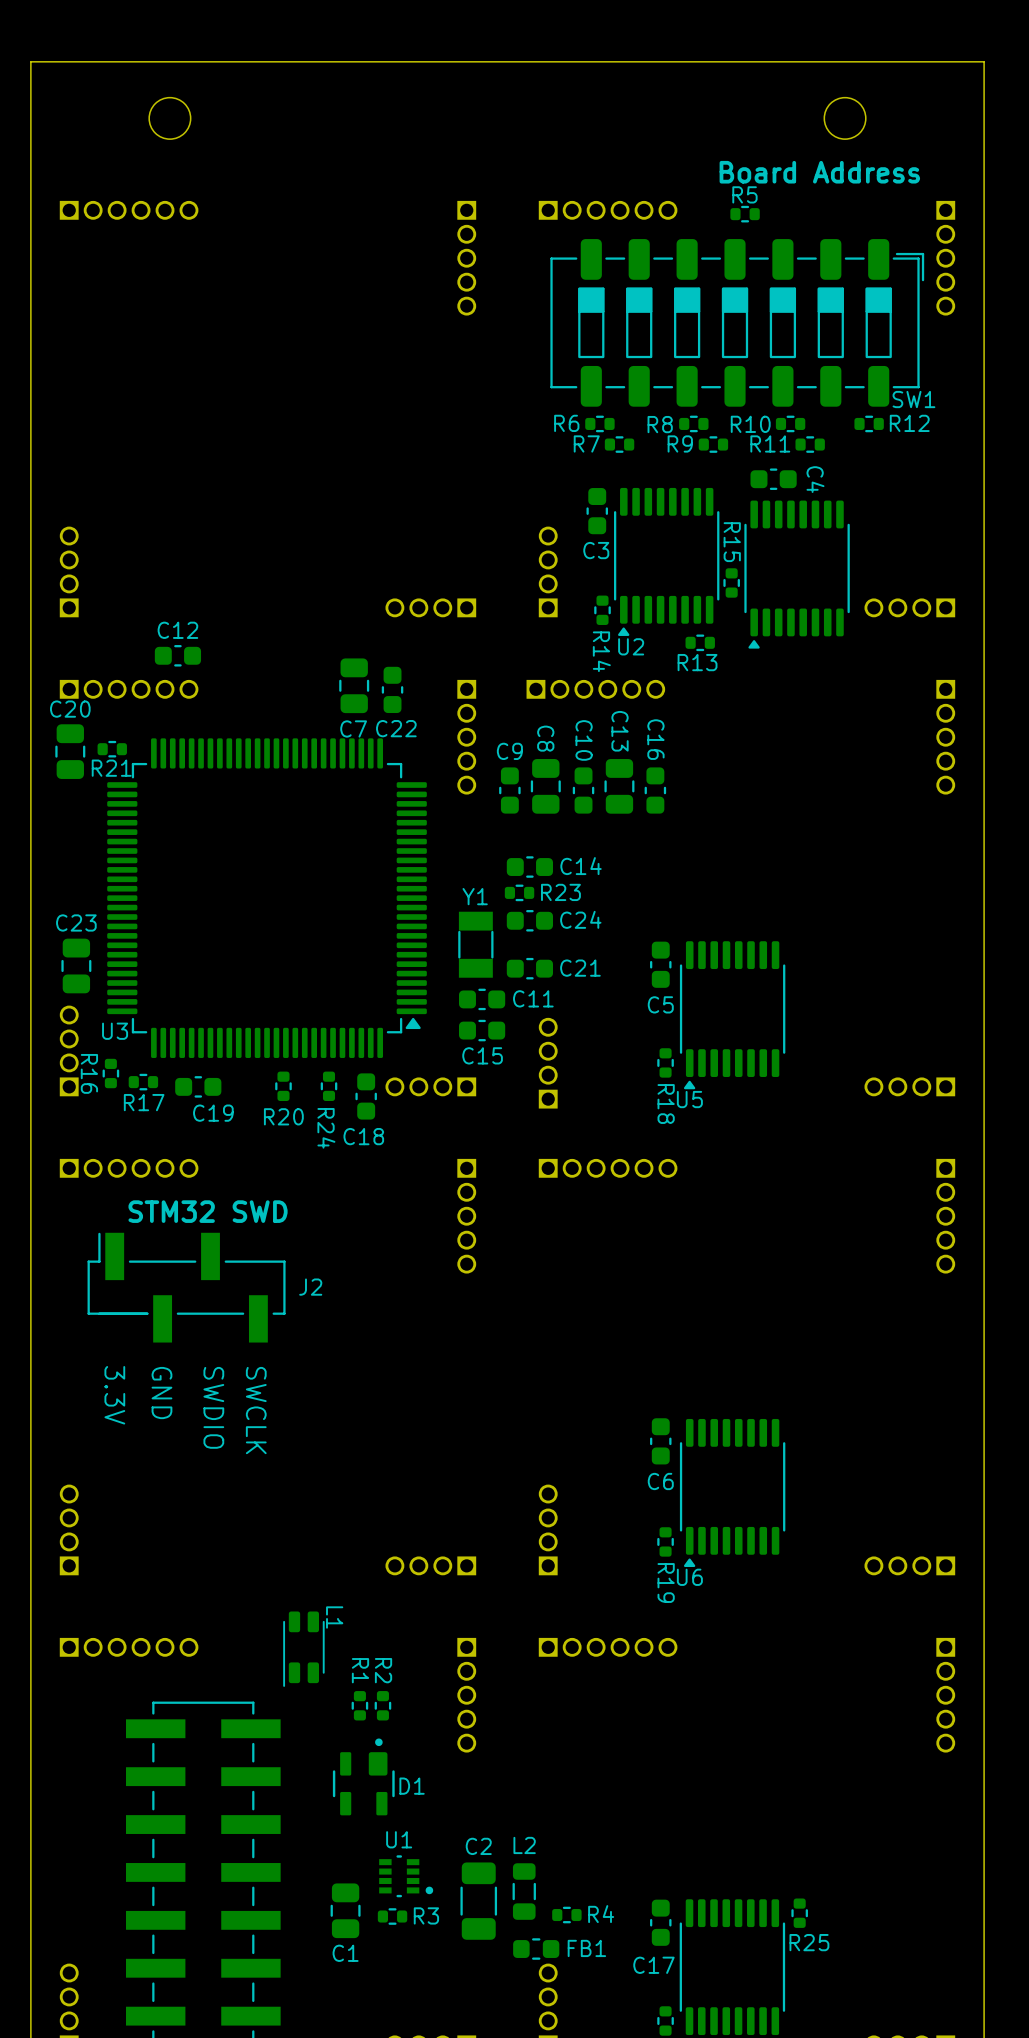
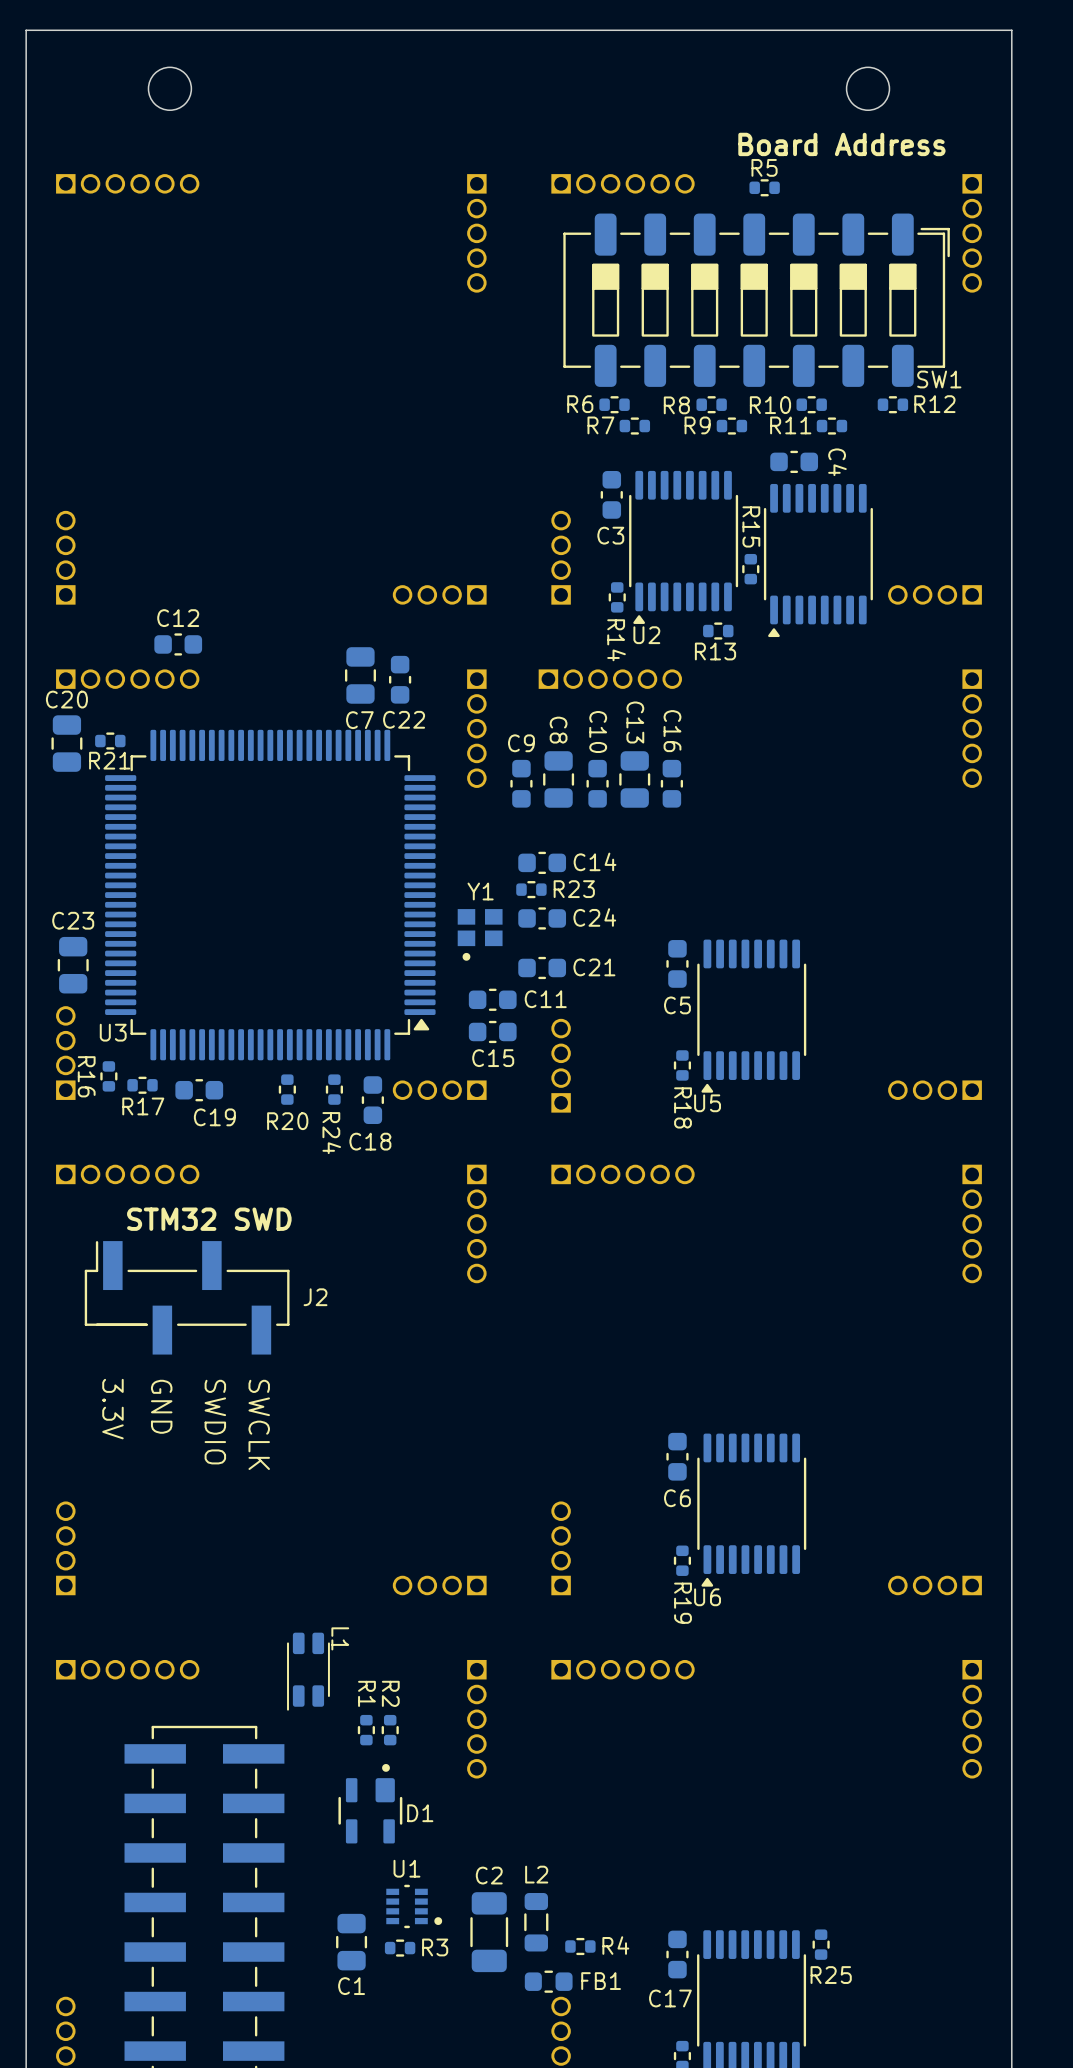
Y1 footprint: [458, 911, 494, 978] -> [457, 909, 503, 961]

